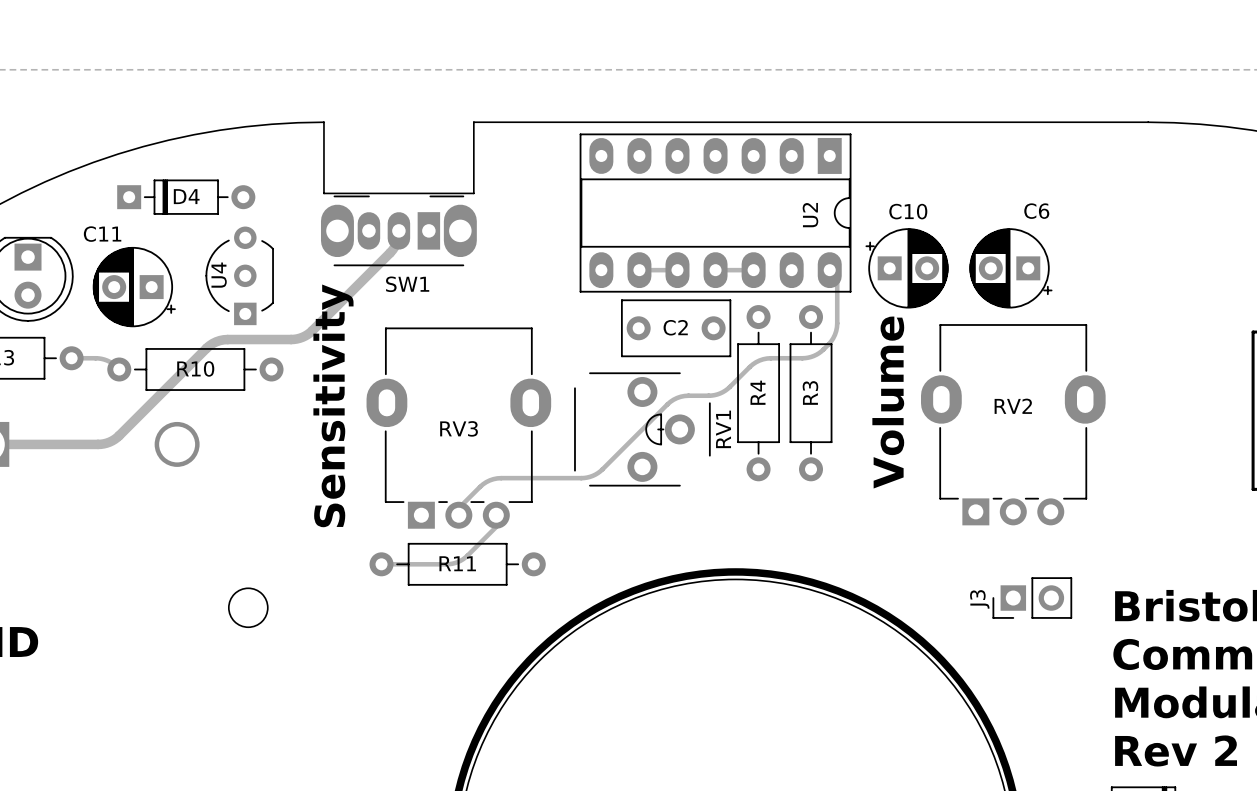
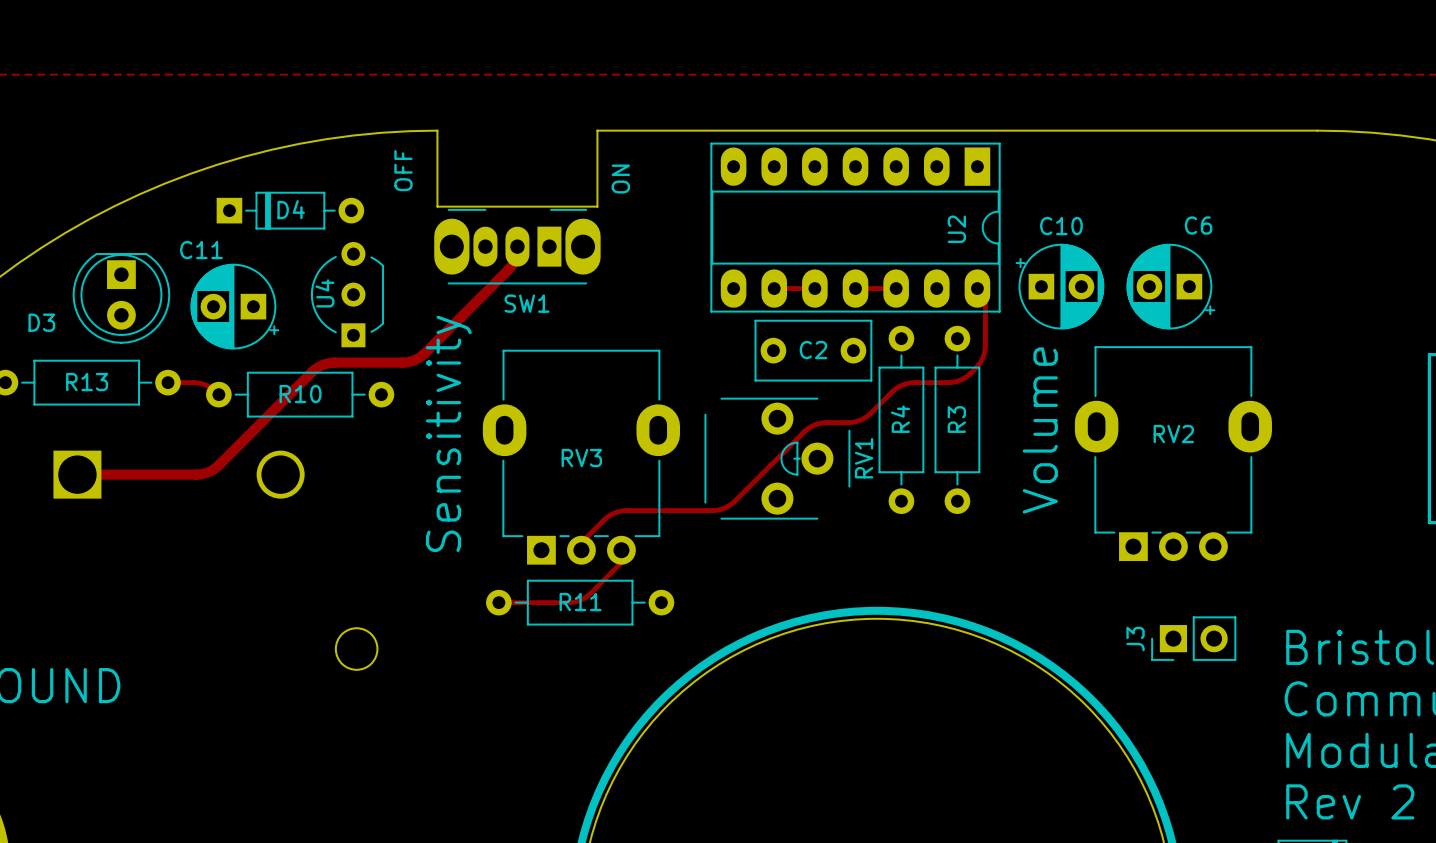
text: none -> OFF (403, 170)
text: none -> ON (620, 179)

